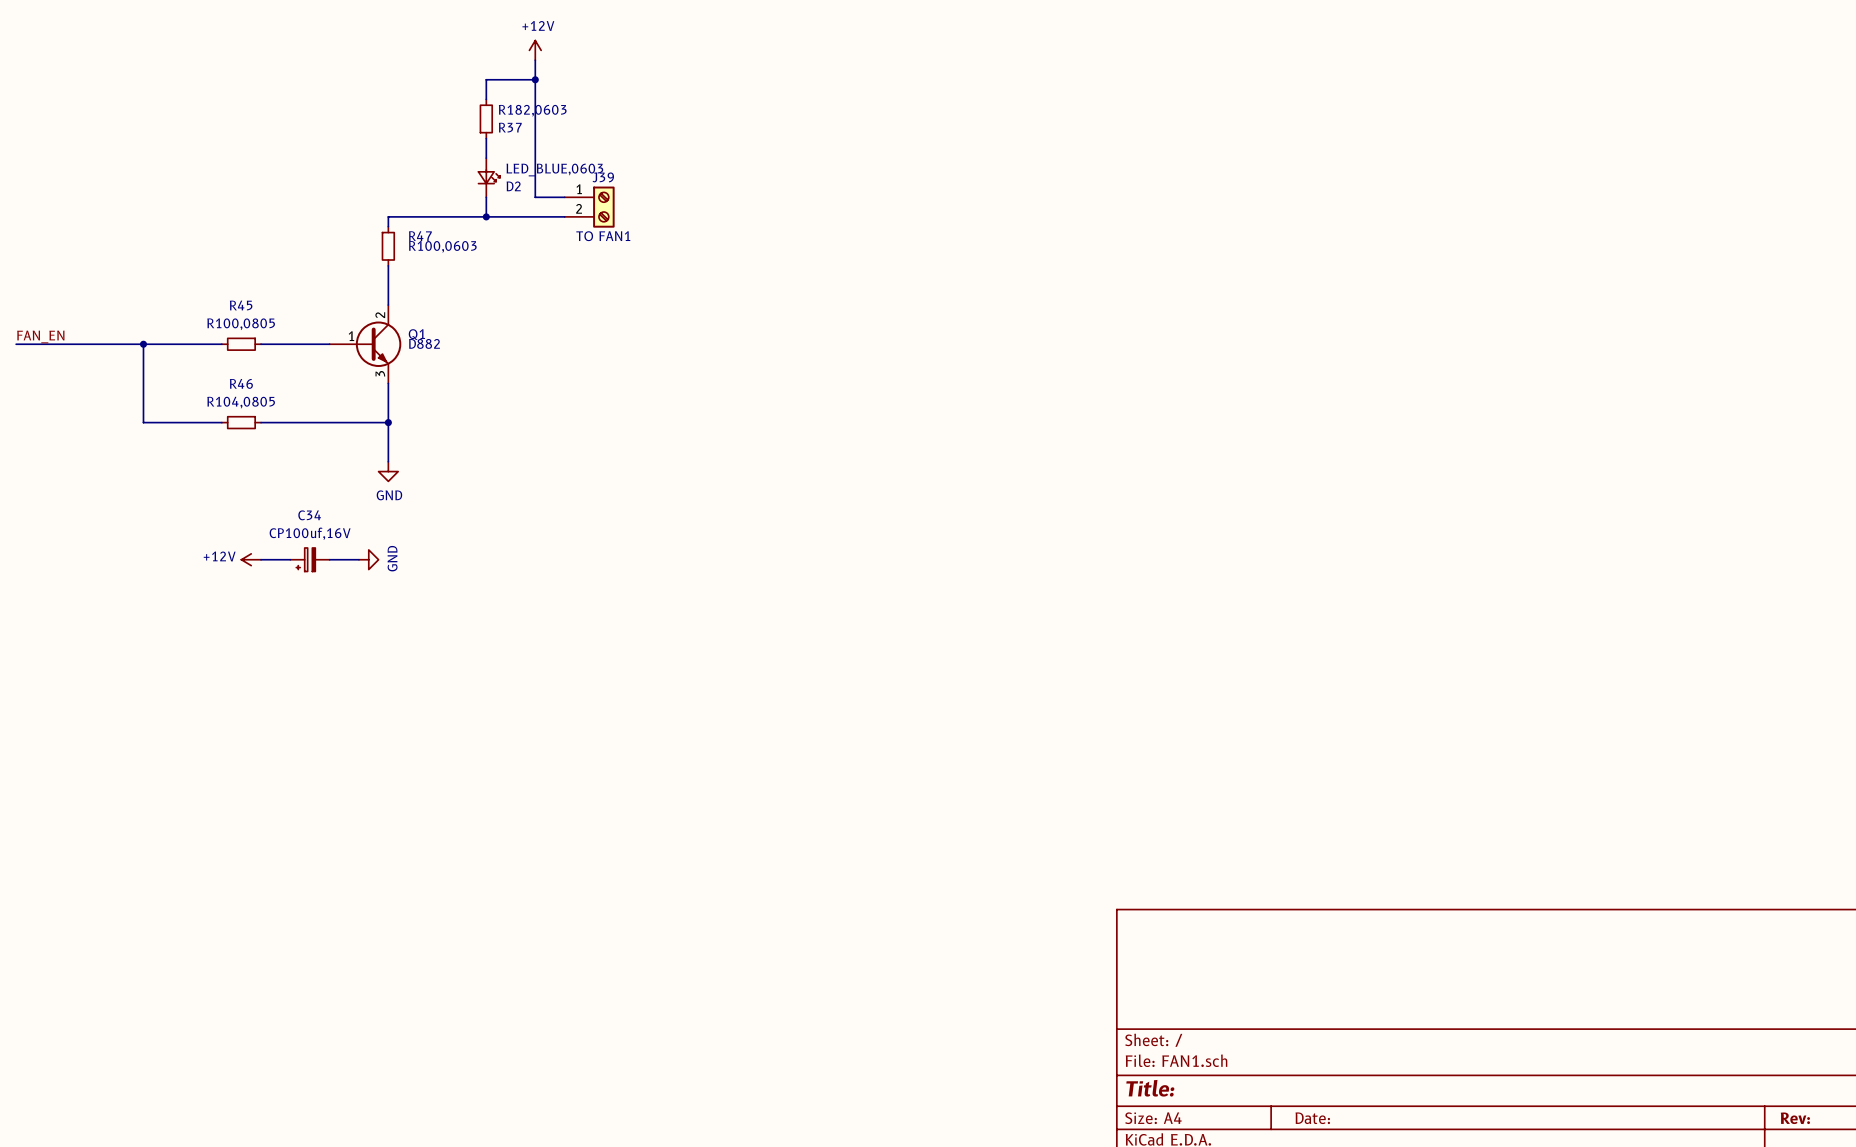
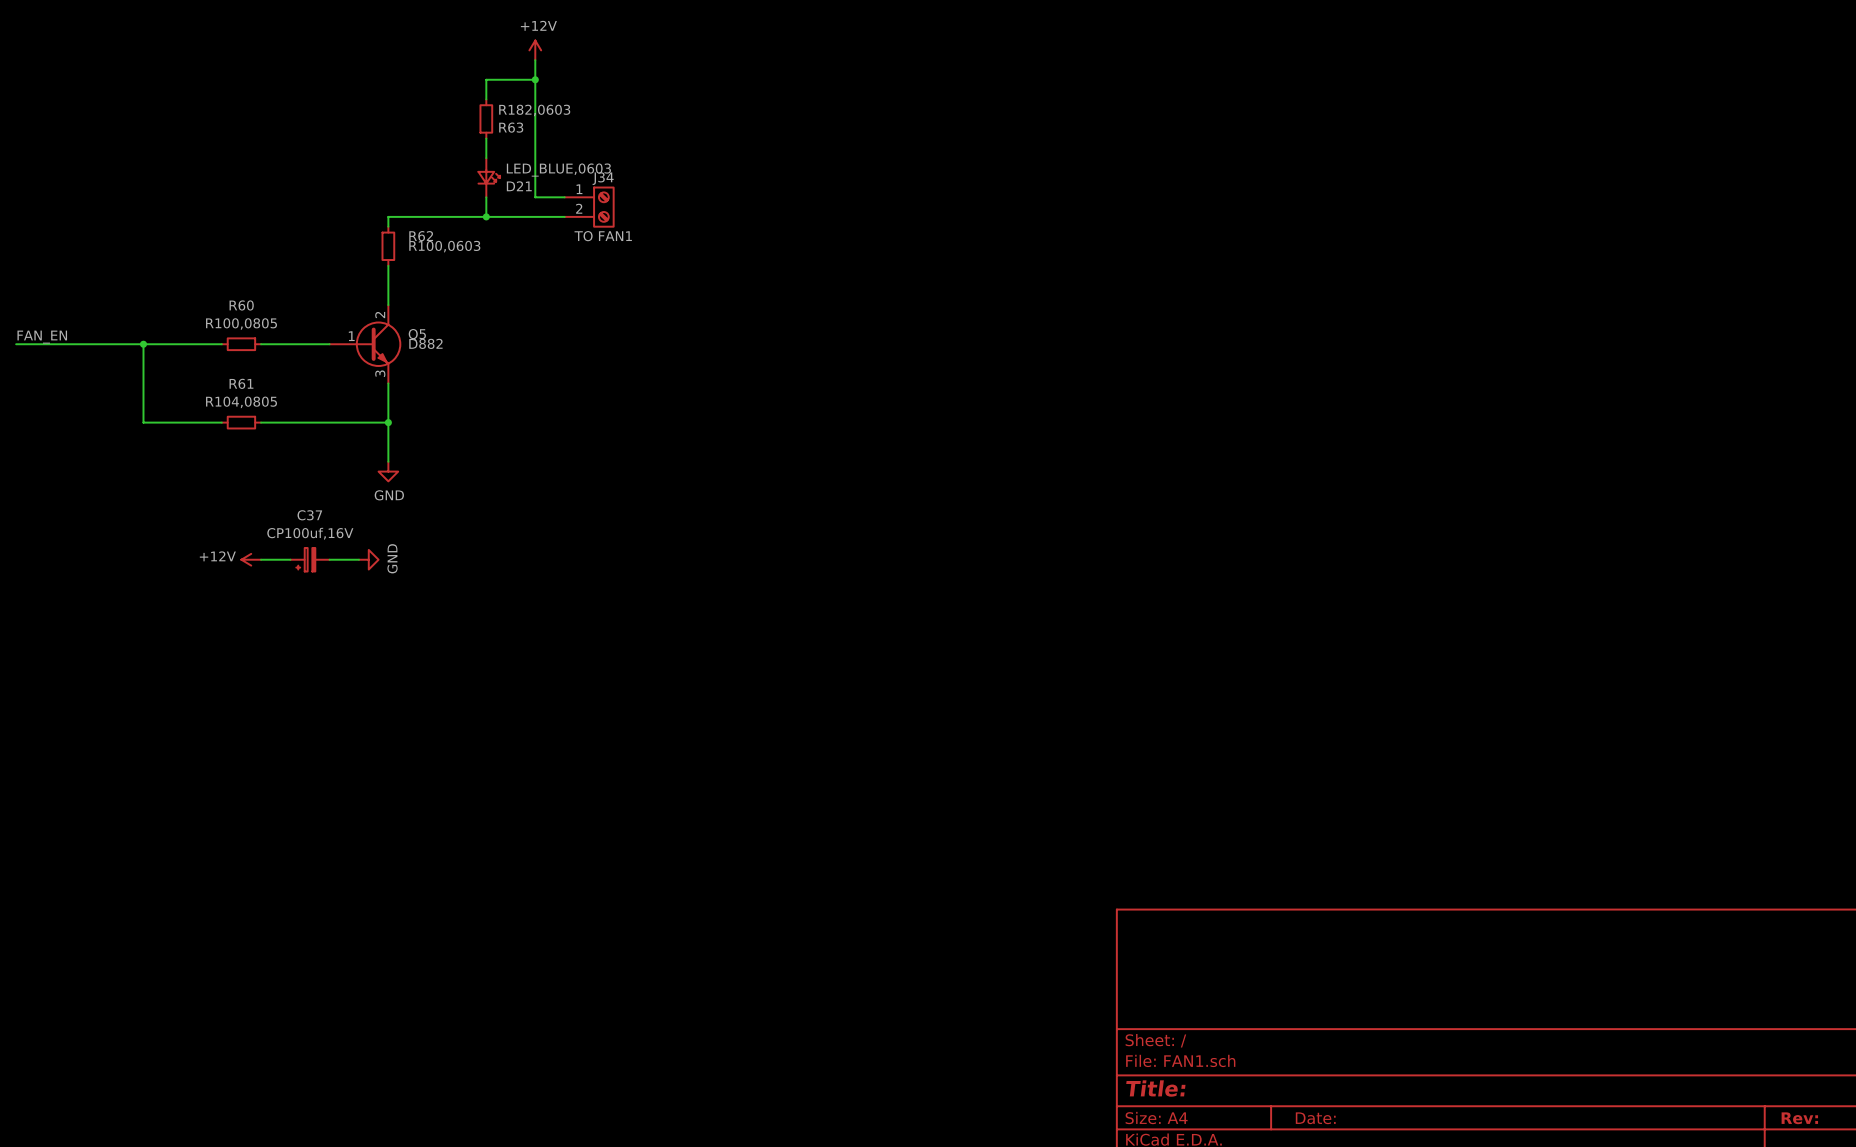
R37 name: R37 (510, 127) -> R63 (511, 127)
J39 name: J39 (603, 177) -> J34 (603, 178)
D2 name: D2 (513, 186) -> D21 (519, 186)
R47 name: R47 (420, 236) -> R62 (421, 236)
R45 name: R45 (241, 305) -> R60 (241, 305)
Q1 name: Q1 (416, 334) -> Q5 (417, 334)
R46 name: R46 (241, 383) -> R61 (241, 383)
C34 name: C34 (309, 515) -> C37 (309, 515)

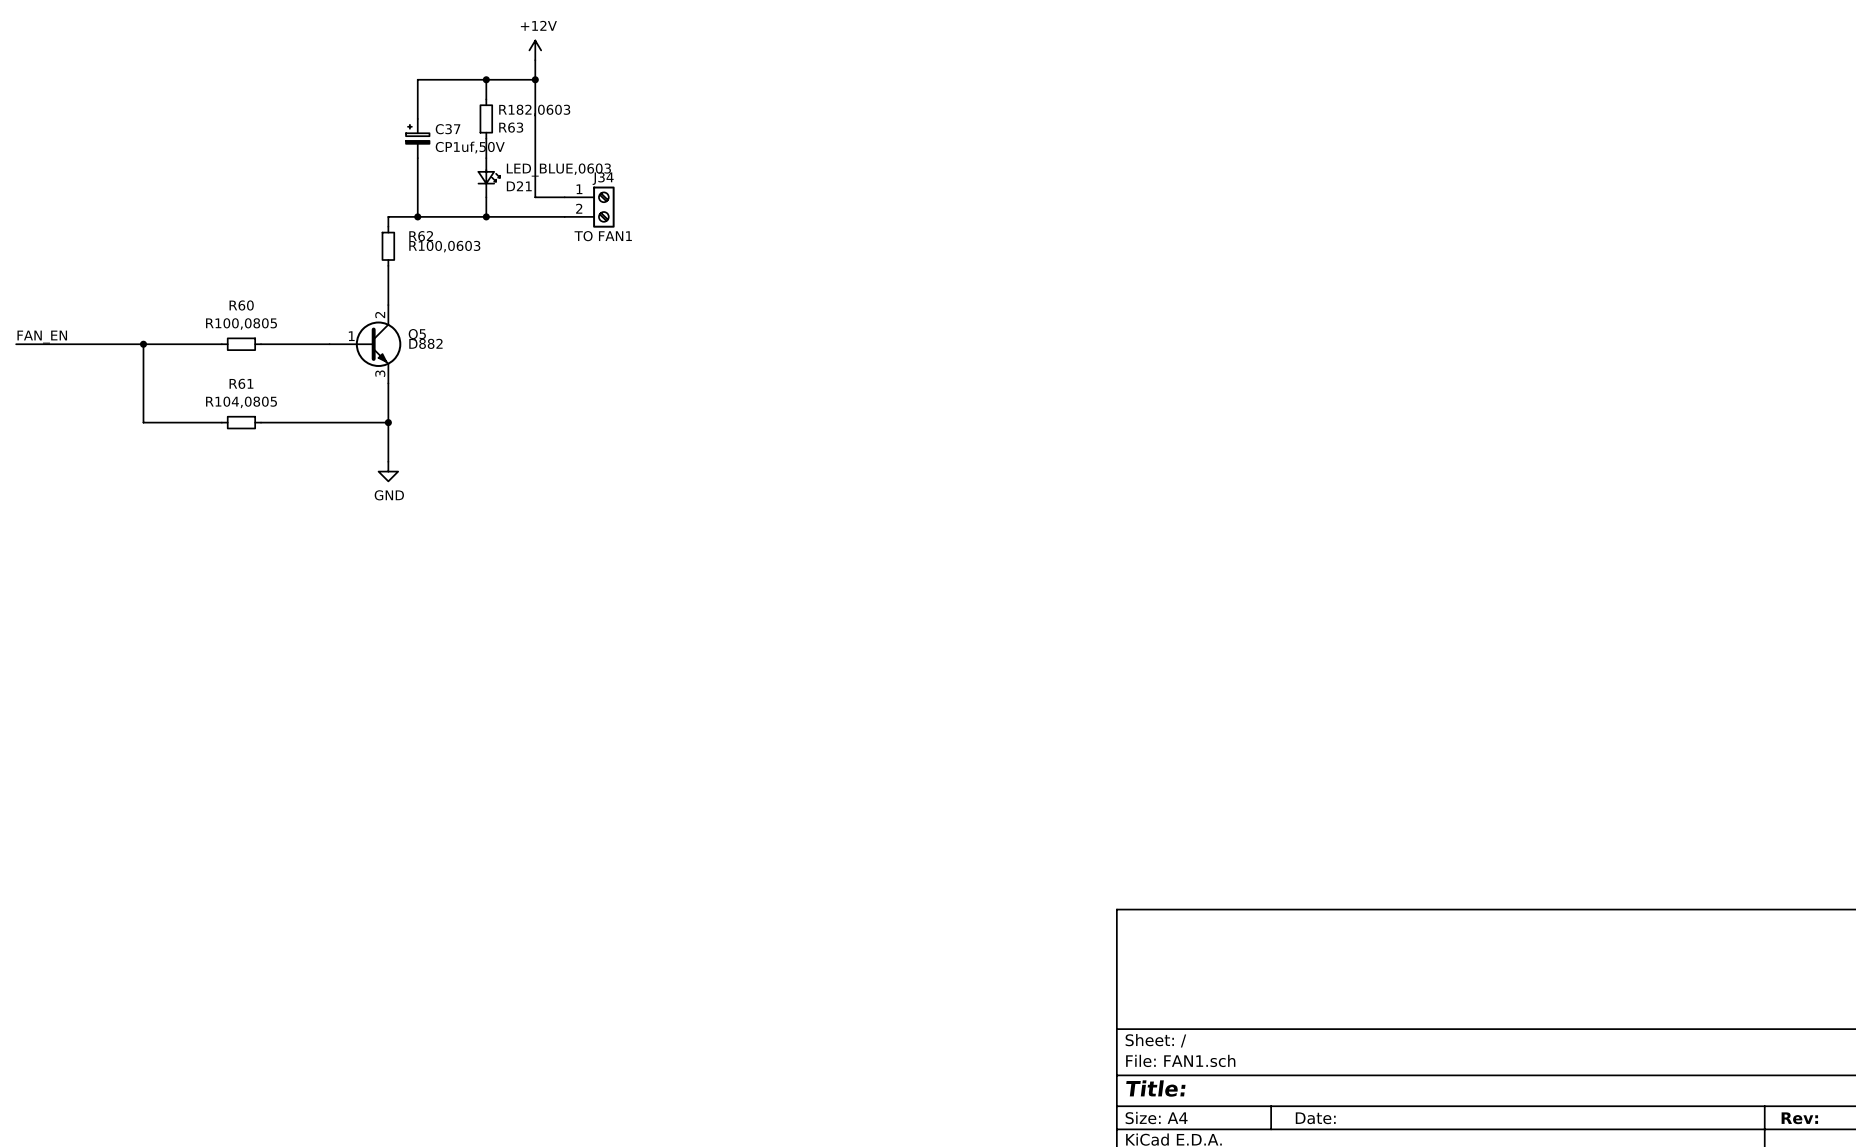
wire: none -> (486, 79) (417, 79) (417, 118)
junction: none -> (486, 79)
wire: none -> (417, 158) (417, 216)
junction: none -> (417, 216)
C37 value: CP100uf,16V (310, 533) -> CP1uf,50V (470, 147)
power symbol: +12V (251, 559) -> none
wire: (261, 559) (290, 559) -> none
C37 rotation: 0° (305, 559) -> 90° clockwise (417, 134)
C37 position: (310, 559) -> (417, 138)
wire: (329, 559) (358, 559) -> none
power symbol: GND (368, 559) -> none

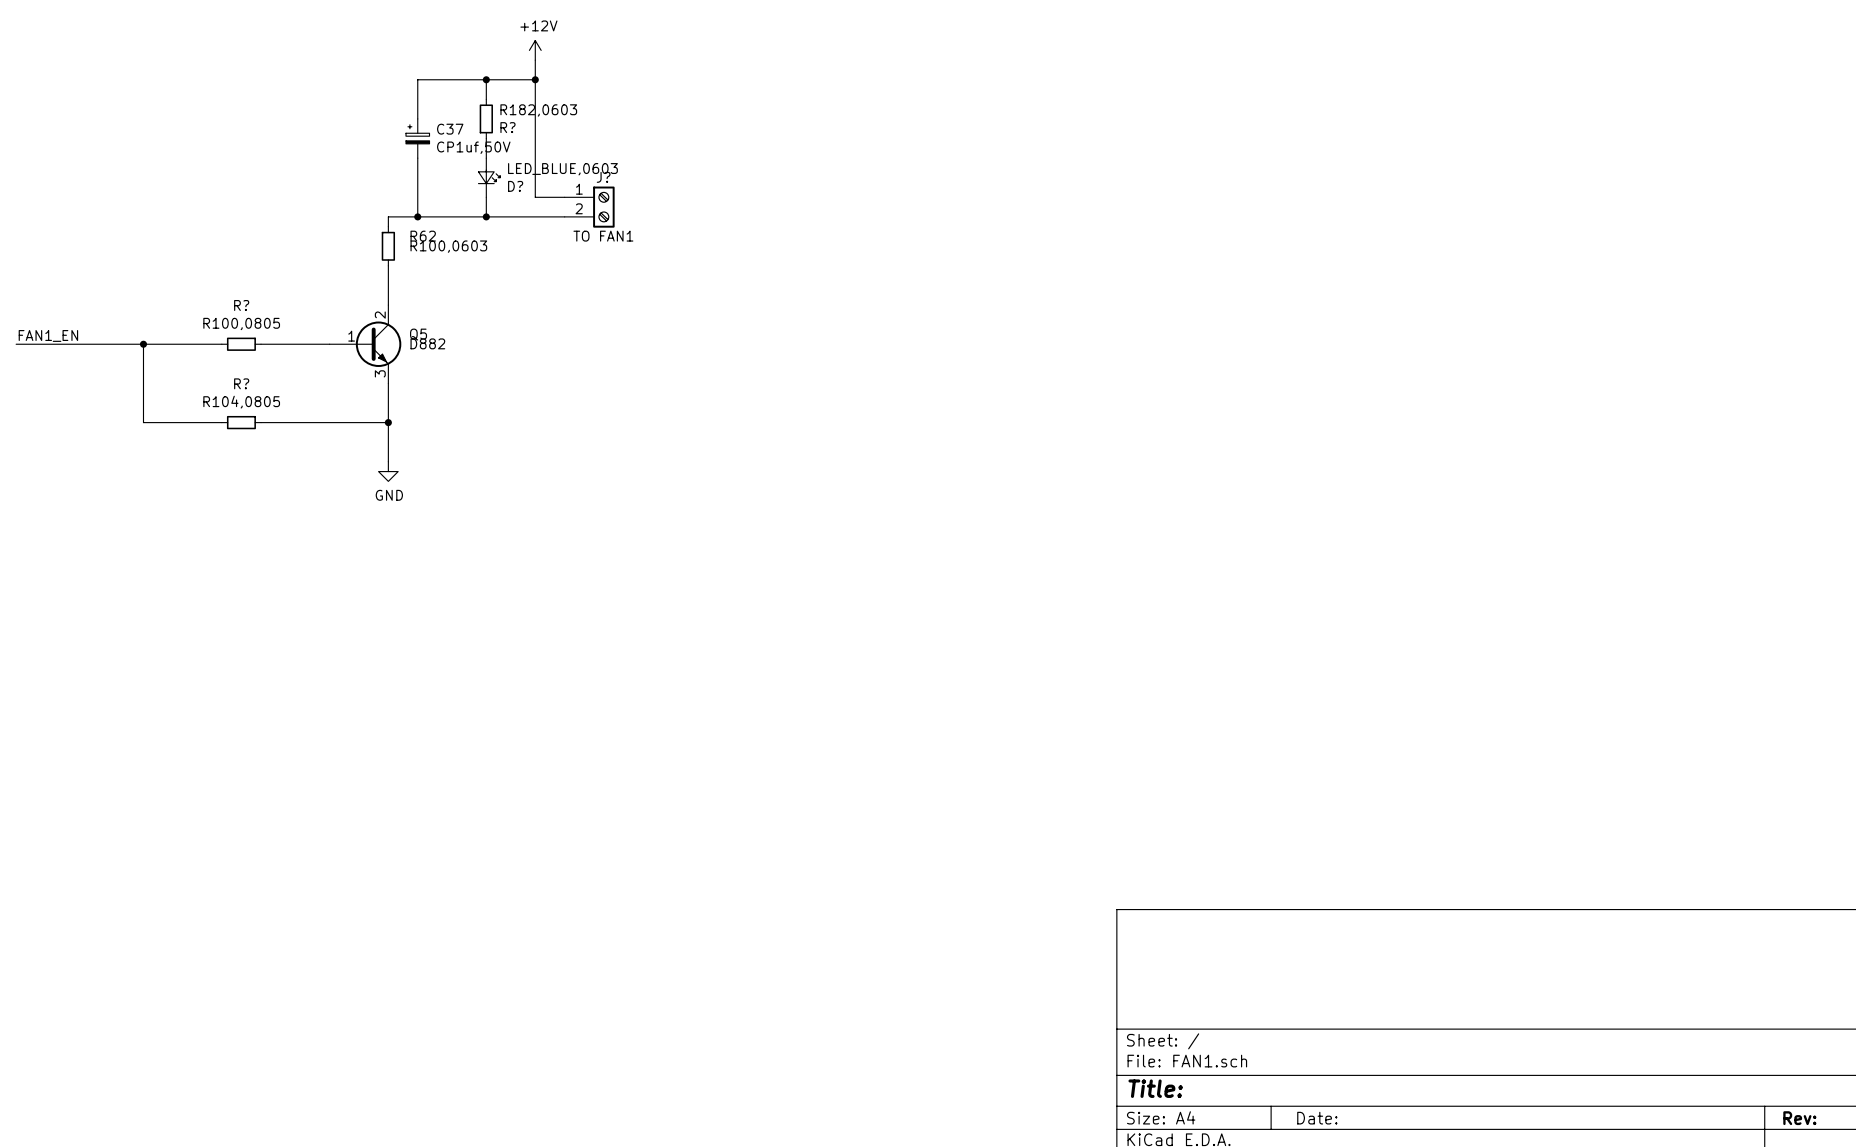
R63 name: R63 (511, 127) -> R? (507, 127)
J34 name: J34 (603, 178) -> J? (603, 177)
D21 name: D21 (519, 186) -> D? (515, 186)
R60 name: R60 (241, 305) -> R? (241, 305)
label: FAN_EN (42, 337) -> FAN1_EN (48, 335)
R61 name: R61 (241, 383) -> R? (241, 383)

